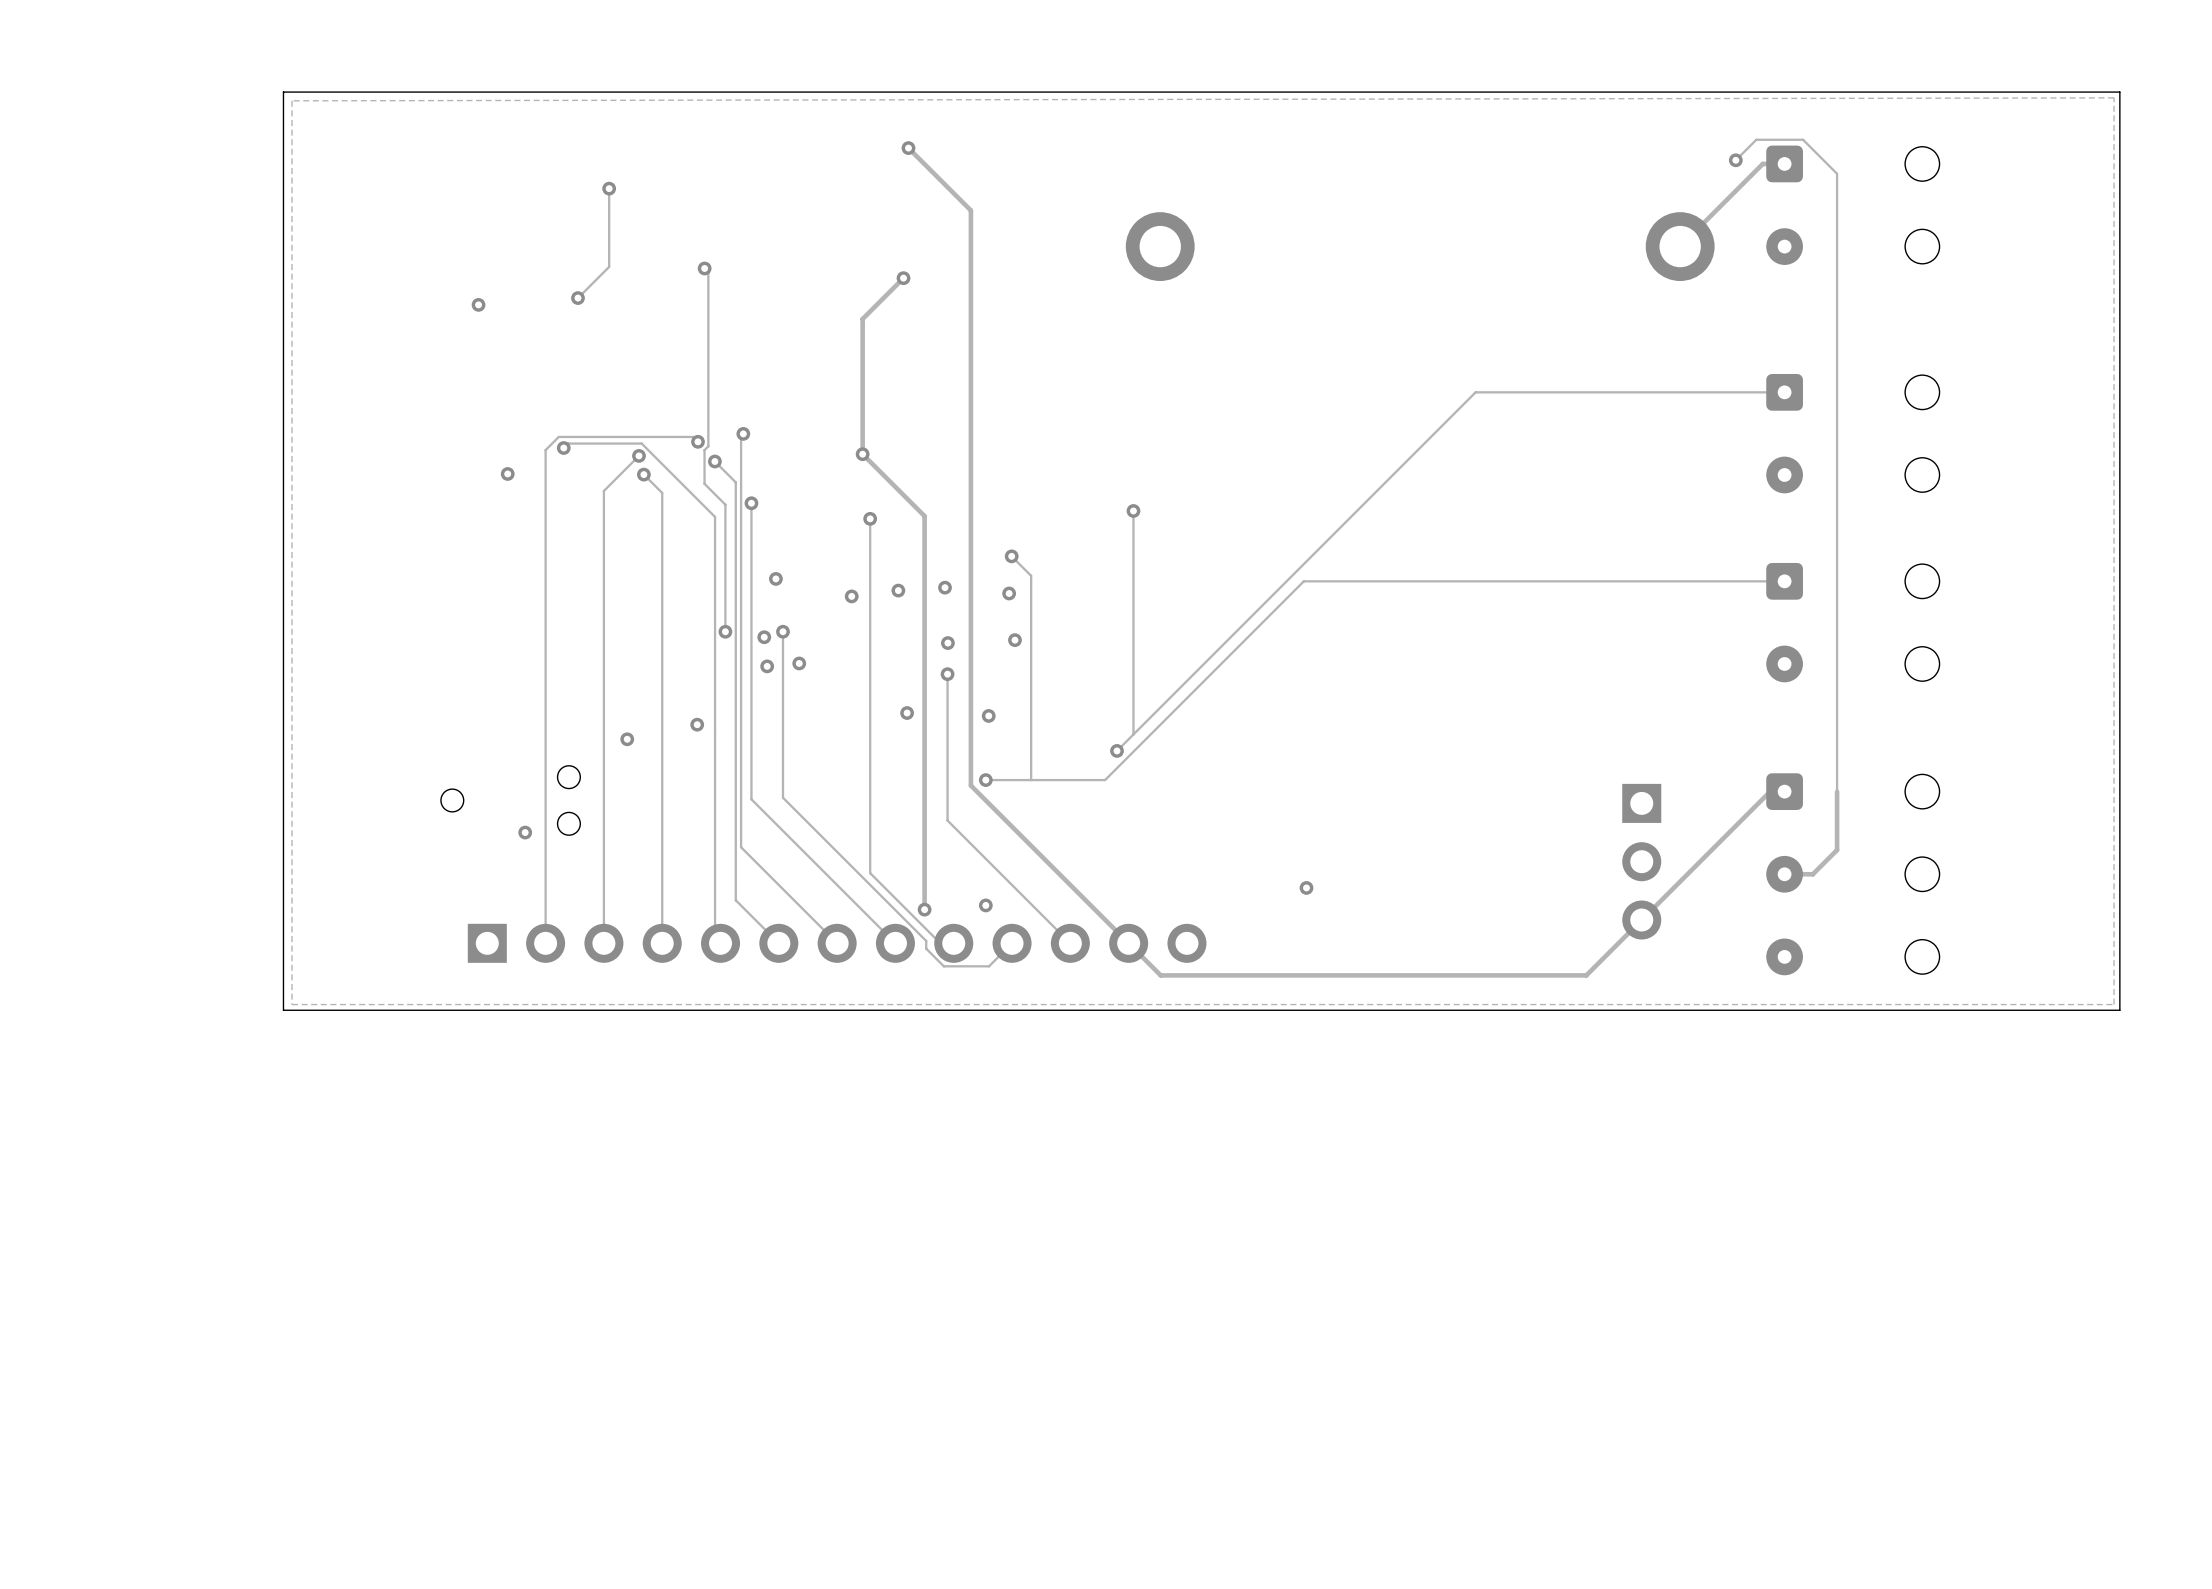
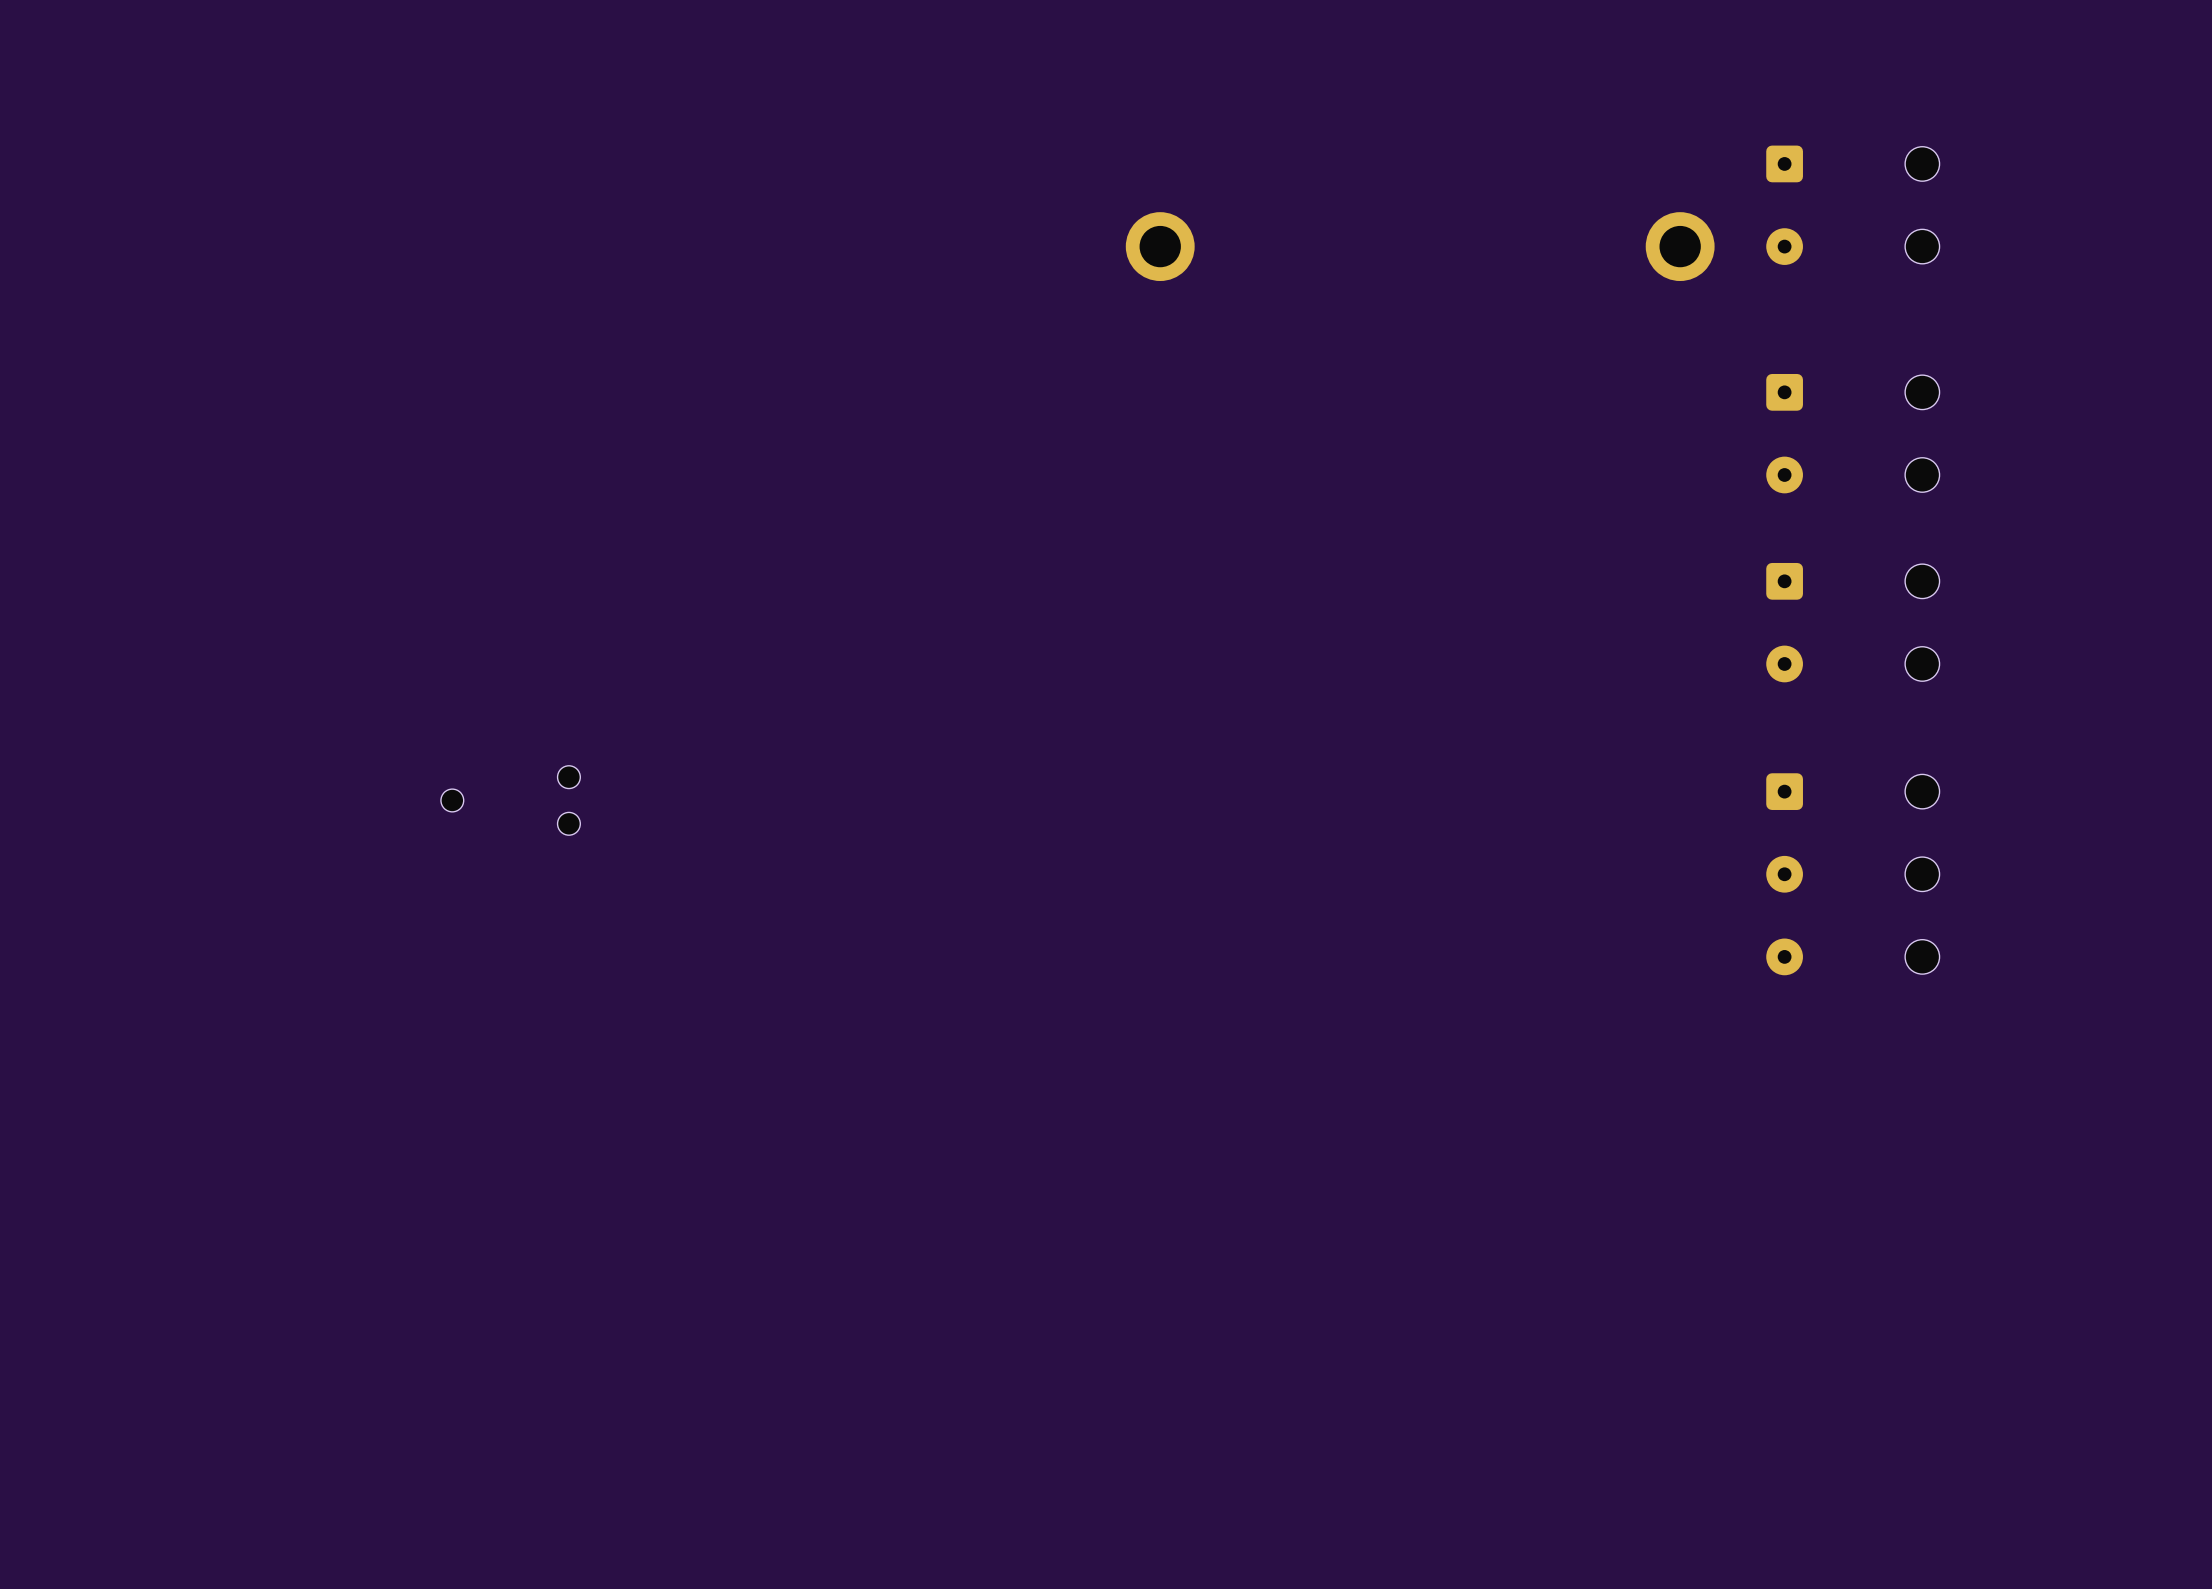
board edge: (2119, 92) (283, 92) (283, 1010) (2119, 1010) (2119, 92) -> none
zone outline: (2114, 97) (291, 100) (291, 1004) (2114, 1004) (2114, 97) -> none
track: (908, 148) (970, 210) (970, 785) (1160, 975) (1586, 975) (1770, 791) (1784, 791) -> none
via: (908, 148) -> none
track: (1735, 160) (1756, 139) (1803, 139) (1837, 173) (1837, 850) (1812, 874) (1784, 874) -> none
via: (1735, 160) -> none
track: (1784, 163) (1762, 163) (1680, 246) -> none
track: (609, 188) (609, 266) (577, 298) -> none
via: (609, 188) -> none
track: (704, 268) (708, 272) (708, 446) (704, 450) (704, 483) (725, 504) (725, 631) -> none
via: (704, 268) -> none
track: (903, 278) (862, 319) (862, 454) (924, 516) (924, 909) -> none
via: (903, 278) -> none
via: (577, 298) -> none
via: (478, 304) -> none
track: (1784, 392) (1475, 392) (1117, 750) -> none
track: (743, 433) (741, 436) (741, 847) (837, 943) -> none
via: (743, 433) -> none
track: (697, 441) (693, 436) (558, 436) (545, 450) (545, 943) -> none
via: (697, 441) -> none
track: (563, 448) (568, 443) (641, 443) (715, 516) (715, 937) (720, 943) -> none
via: (563, 448) -> none
via: (862, 454) -> none
track: (638, 455) (603, 490) (603, 943) -> none
via: (638, 455) -> none
track: (714, 461) (735, 482) (735, 900) (778, 943) -> none
via: (714, 461) -> none
via: (507, 473) -> none
track: (643, 474) (662, 492) (662, 943) -> none
via: (643, 474) -> none
track: (751, 503) (751, 799) (895, 943) -> none
via: (751, 503) -> none
track: (1133, 510) (1133, 734) -> none
via: (1133, 510) -> none
track: (870, 518) (870, 873) (940, 943) (953, 943) -> none
via: (870, 518) -> none
track: (1011, 556) (1031, 575) (1031, 780) -> none
via: (1011, 556) -> none
via: (775, 578) -> none
track: (1784, 581) (1303, 581) (1105, 780) (985, 780) -> none
via: (945, 587) -> none
via: (898, 590) -> none
via: (1009, 593) -> none
via: (851, 596) -> none
via: (725, 631) -> none
track: (782, 631) (782, 797) (926, 940) (926, 948) (943, 966) (989, 966) (1012, 943) -> none
via: (782, 631) -> none
via: (764, 637) -> none
via: (1014, 640) -> none
via: (947, 643) -> none
via: (799, 663) -> none
via: (767, 666) -> none
track: (947, 674) (947, 820) (1070, 943) -> none
via: (947, 674) -> none
via: (907, 713) -> none
via: (988, 715) -> none
via: (697, 724) -> none
via: (627, 739) -> none
via: (1117, 750) -> none
via: (985, 780) -> none
via: (525, 832) -> none
part: (1641, 861) -> none
via: (1306, 887) -> none
via: (985, 905) -> none
via: (924, 909) -> none
part: (837, 943) -> none

